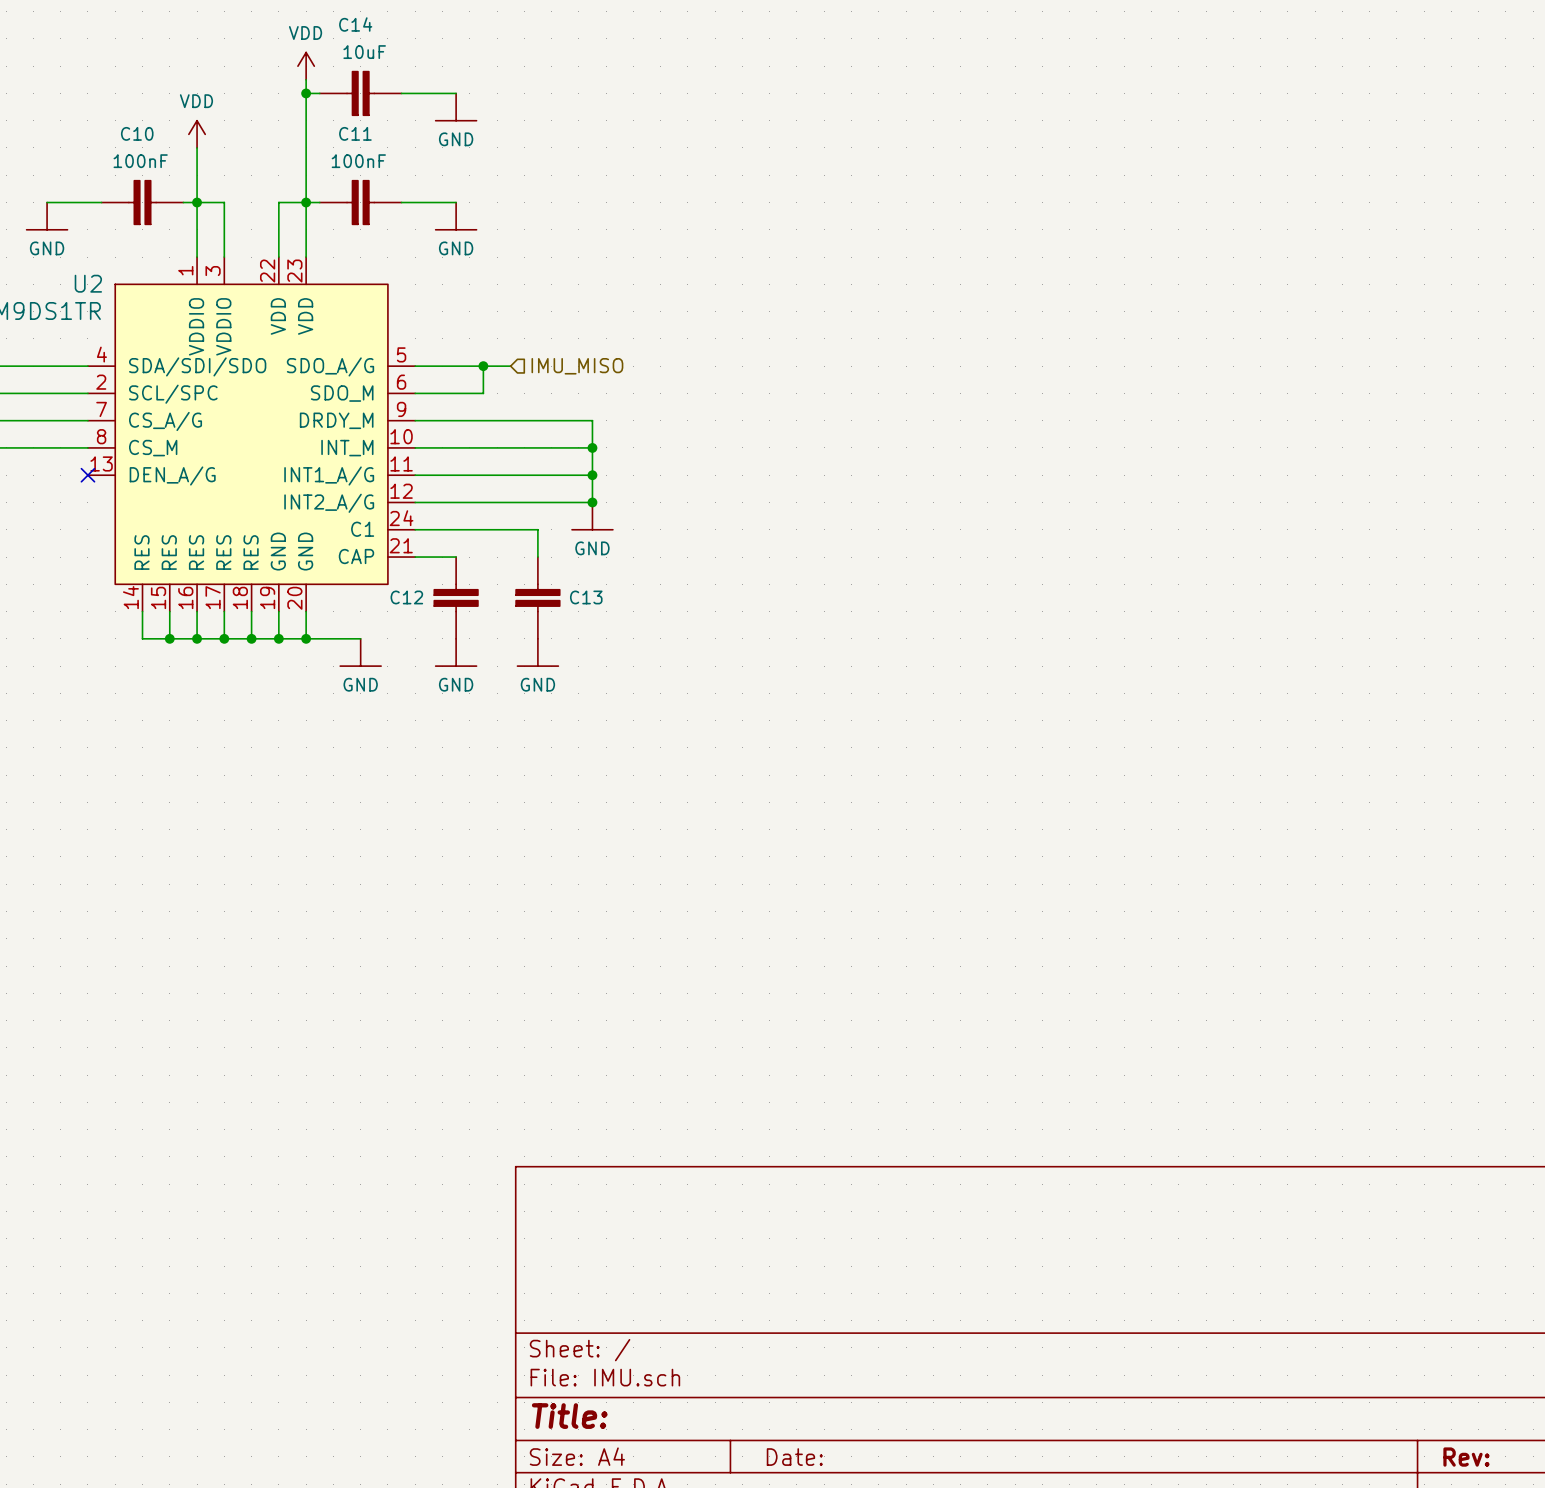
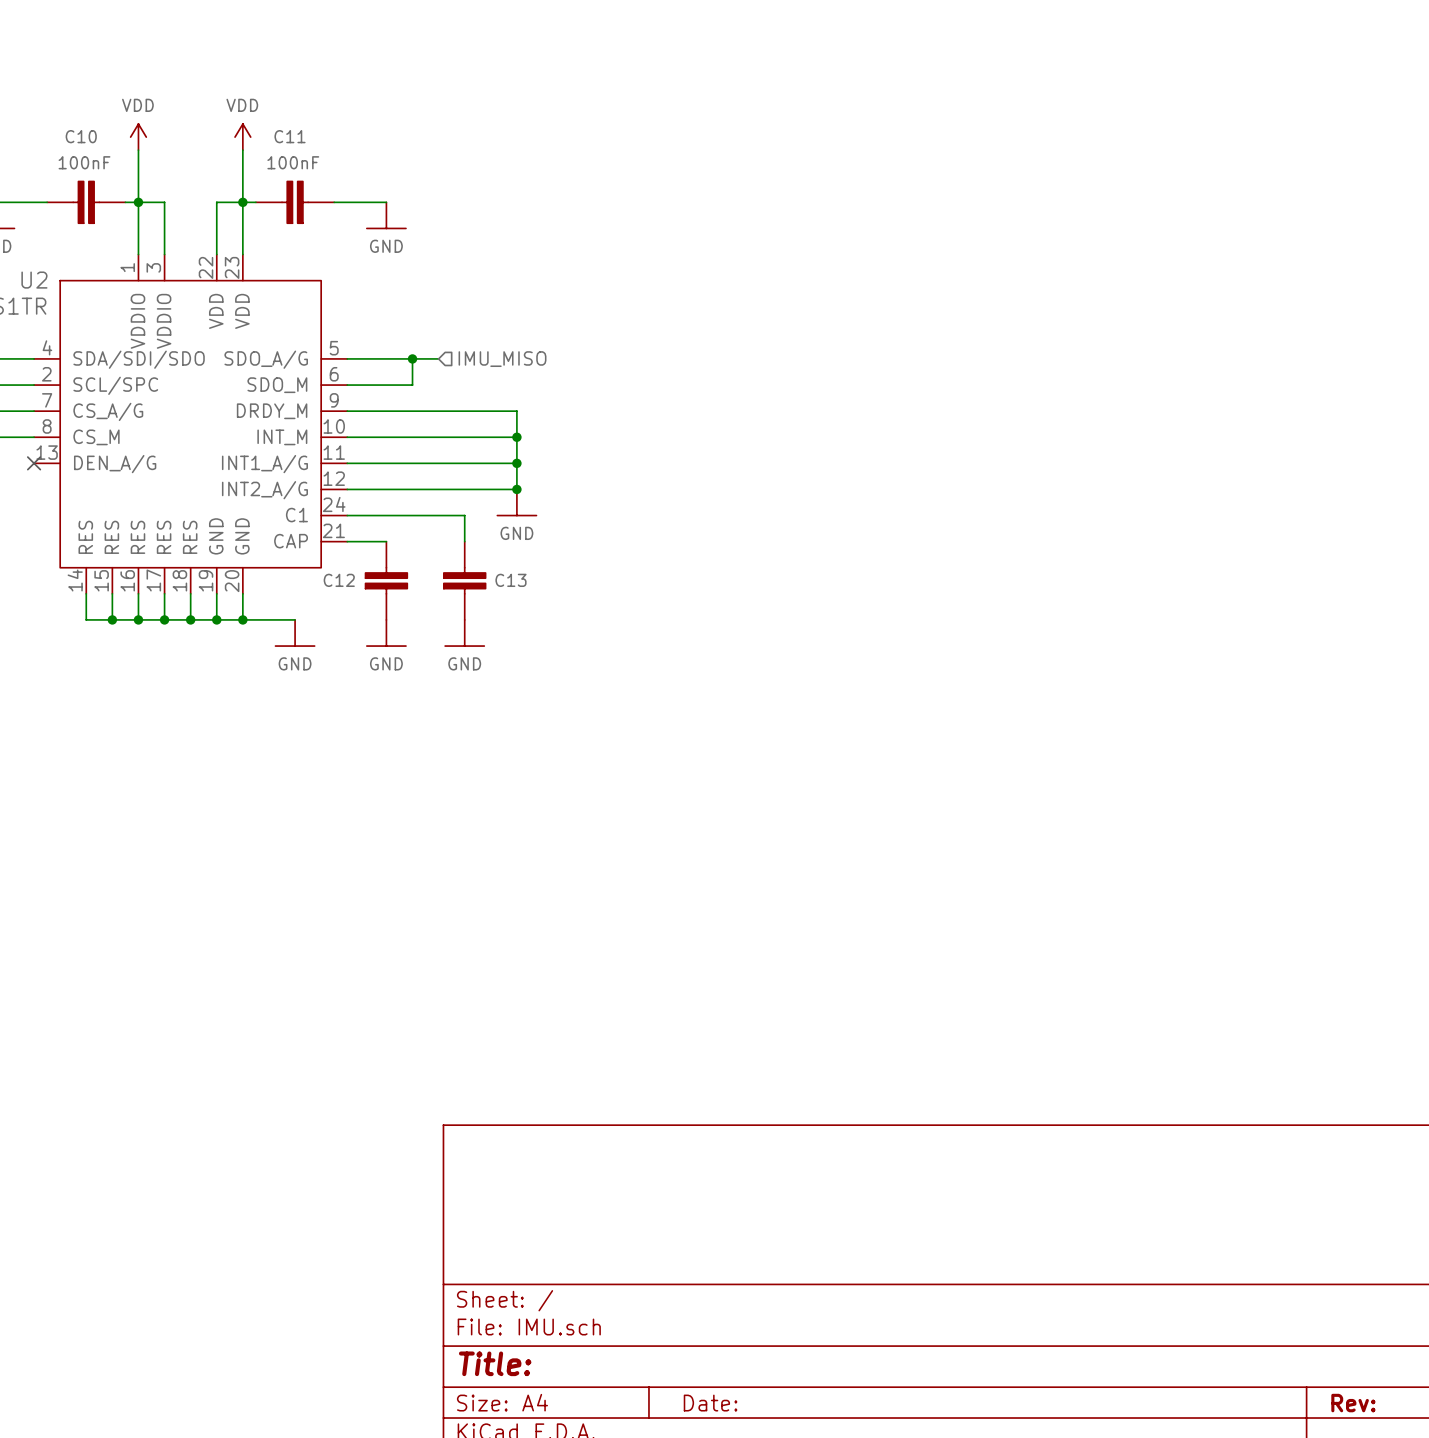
power symbol position: VDD (306, 66) -> VDD (242, 137)
wire: (306, 79) (306, 147) -> none
wire: (306, 93) (319, 93) -> none
junction: (306, 93) -> none
C14: 10uF (360, 93) -> none
wire: (401, 93) (456, 93) -> none
power symbol: GND (456, 107) -> none

